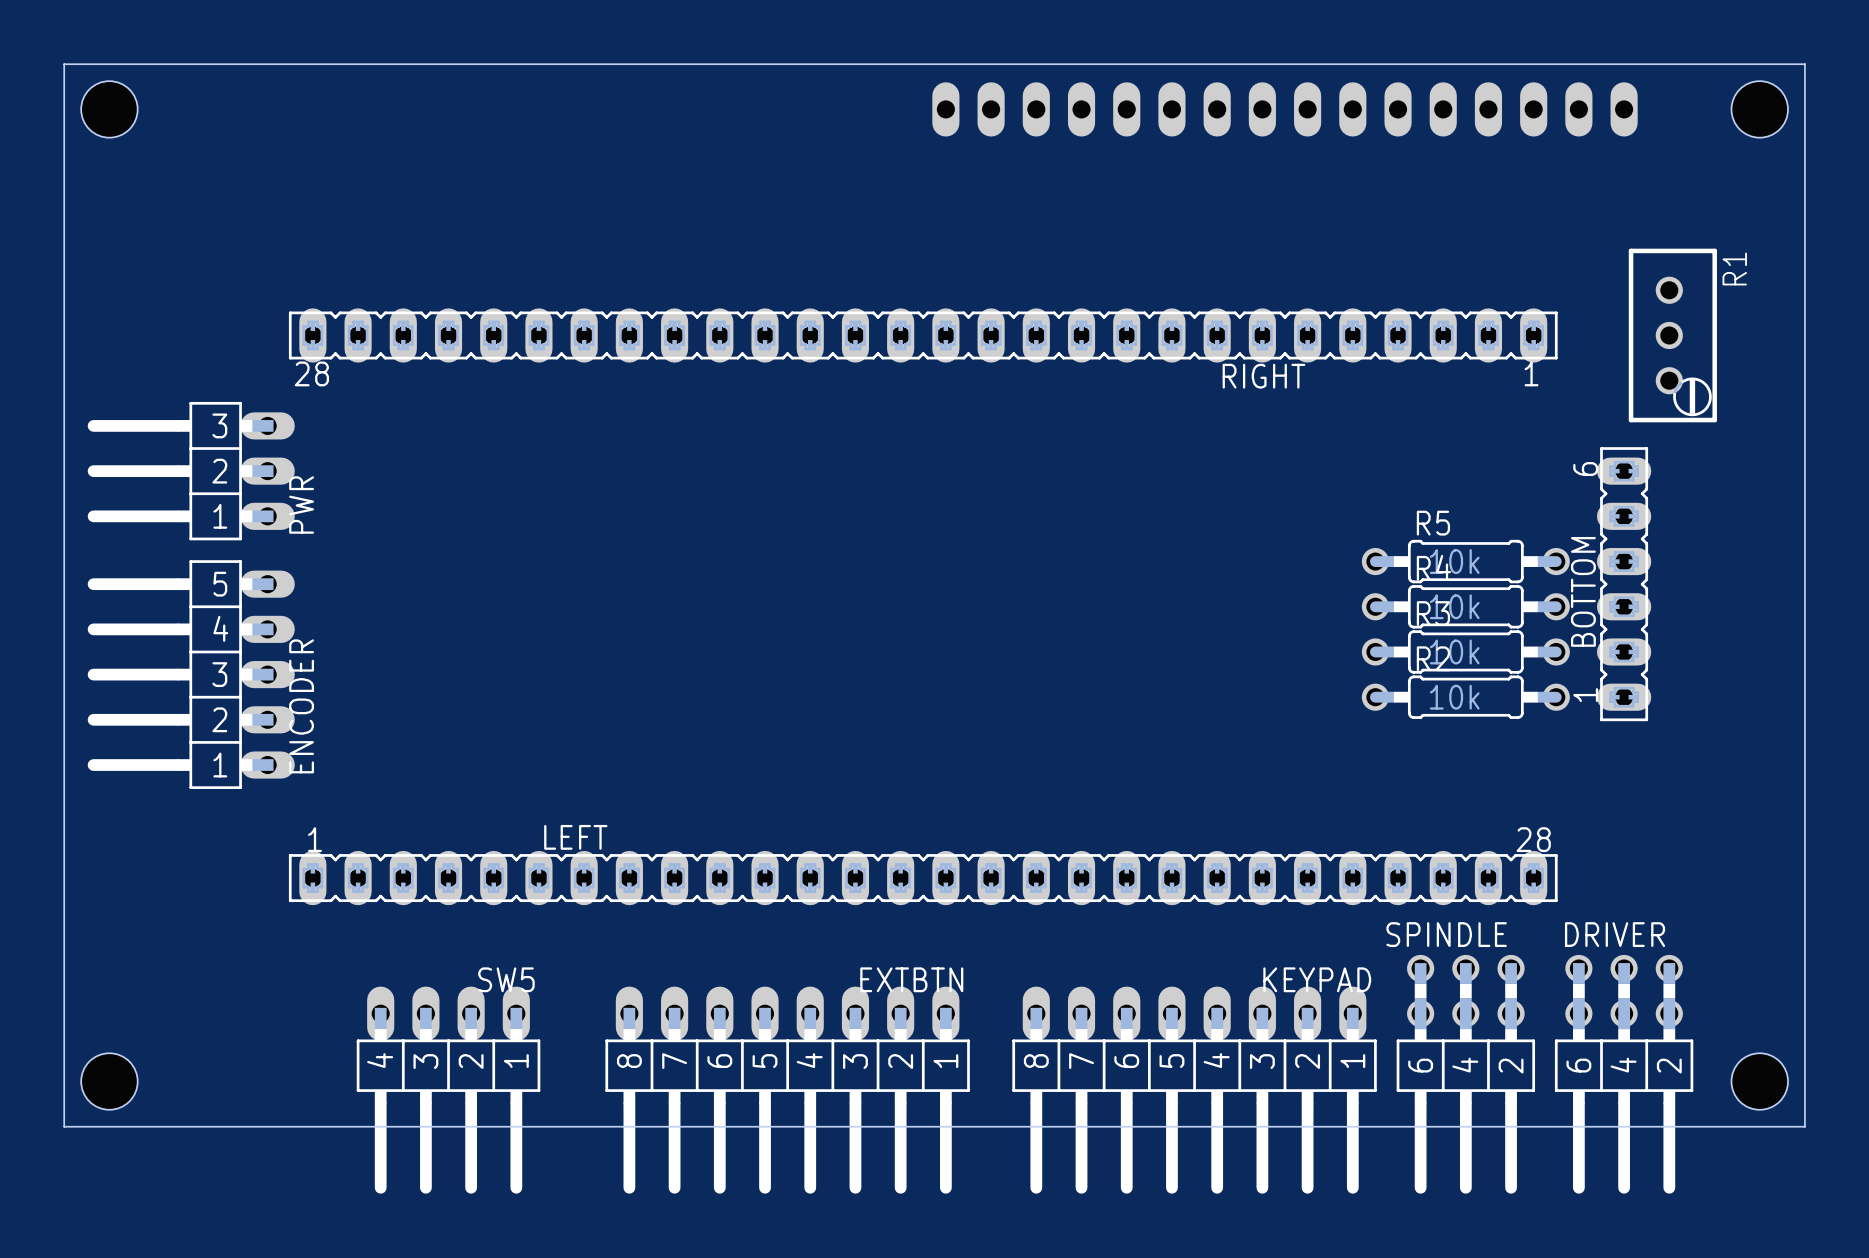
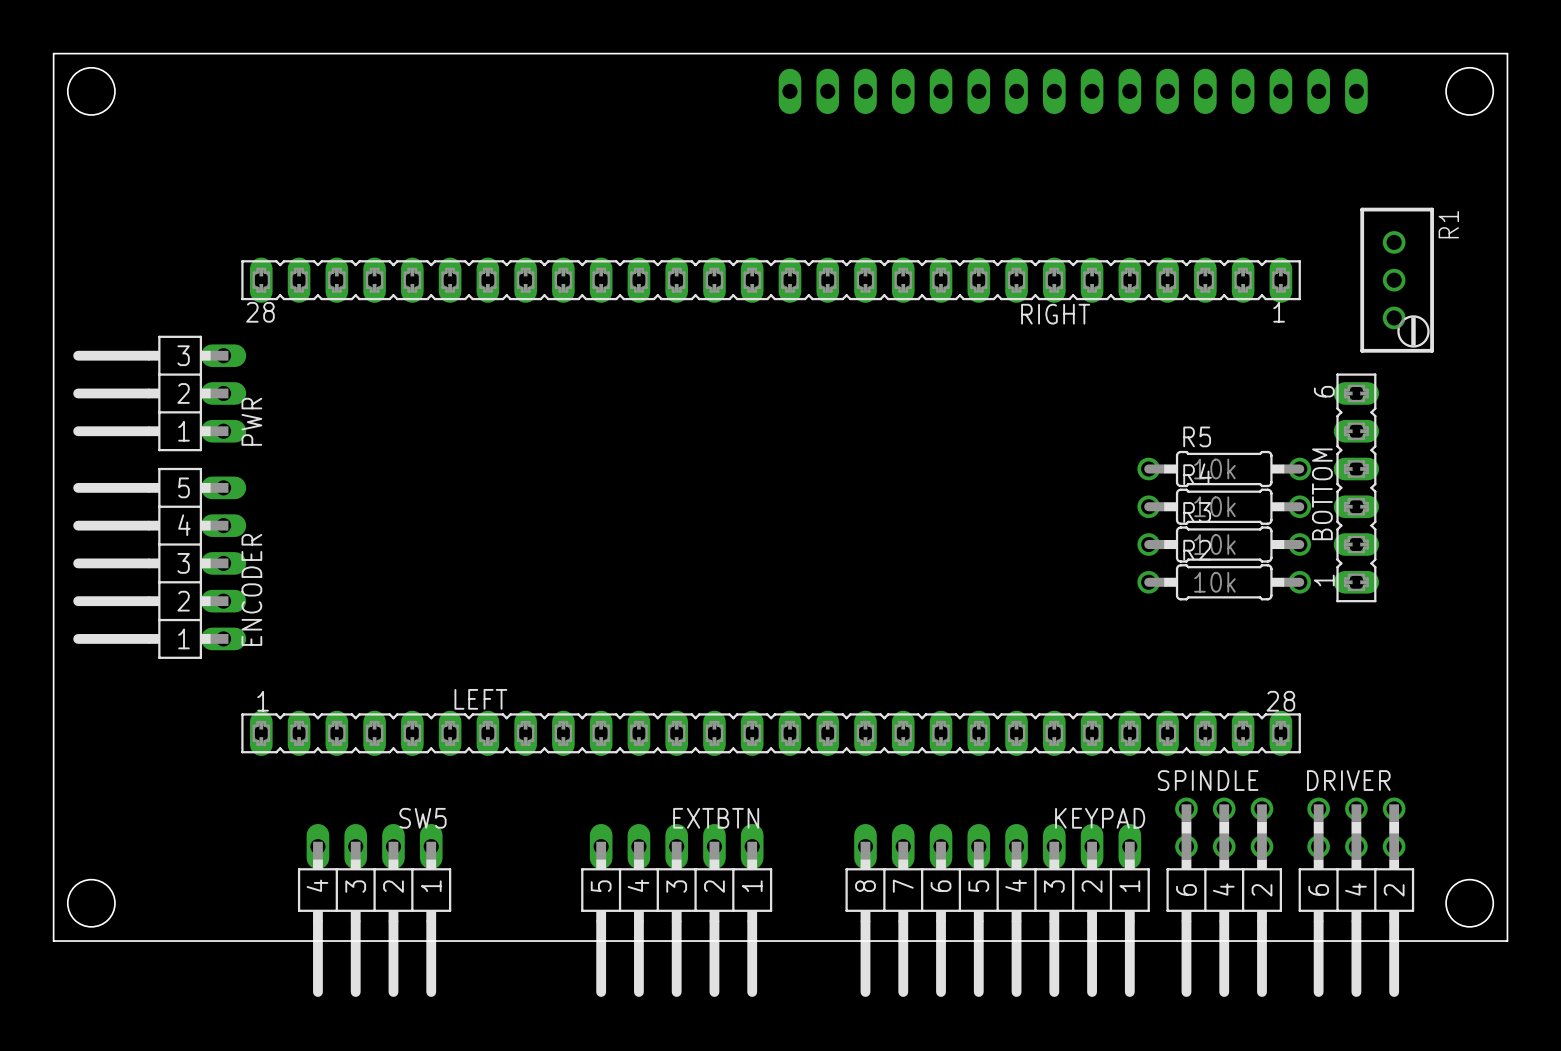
EXTBTN: (787, 1090) -> none
EXTBTN: none -> (676, 910)

